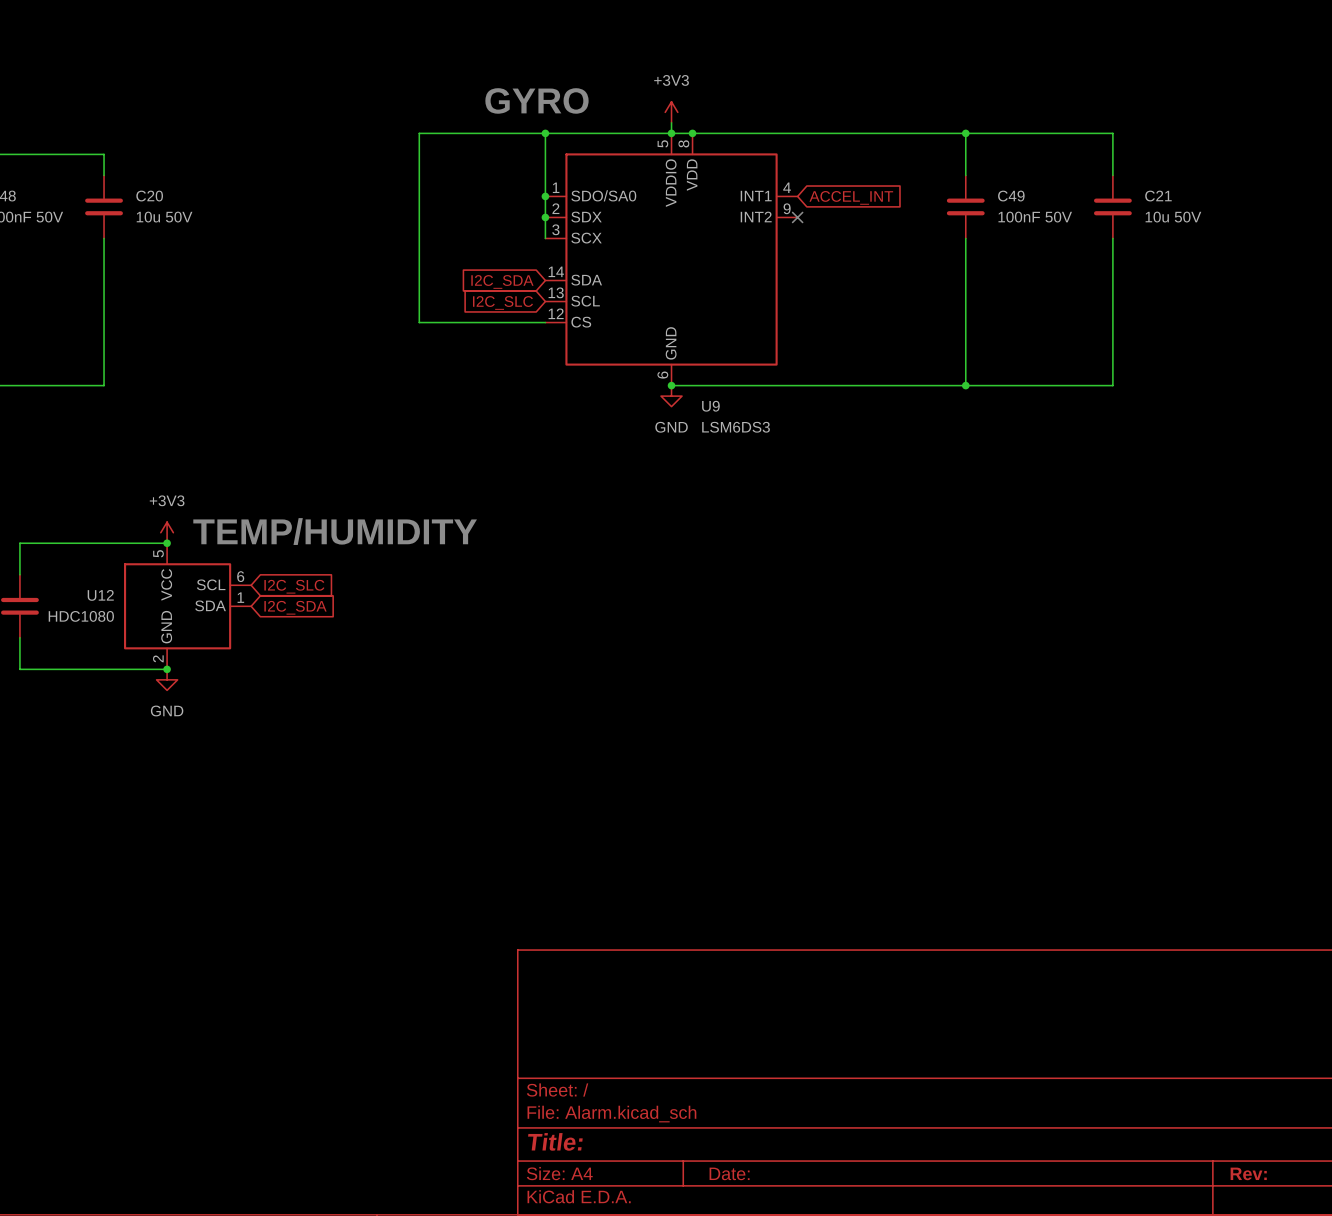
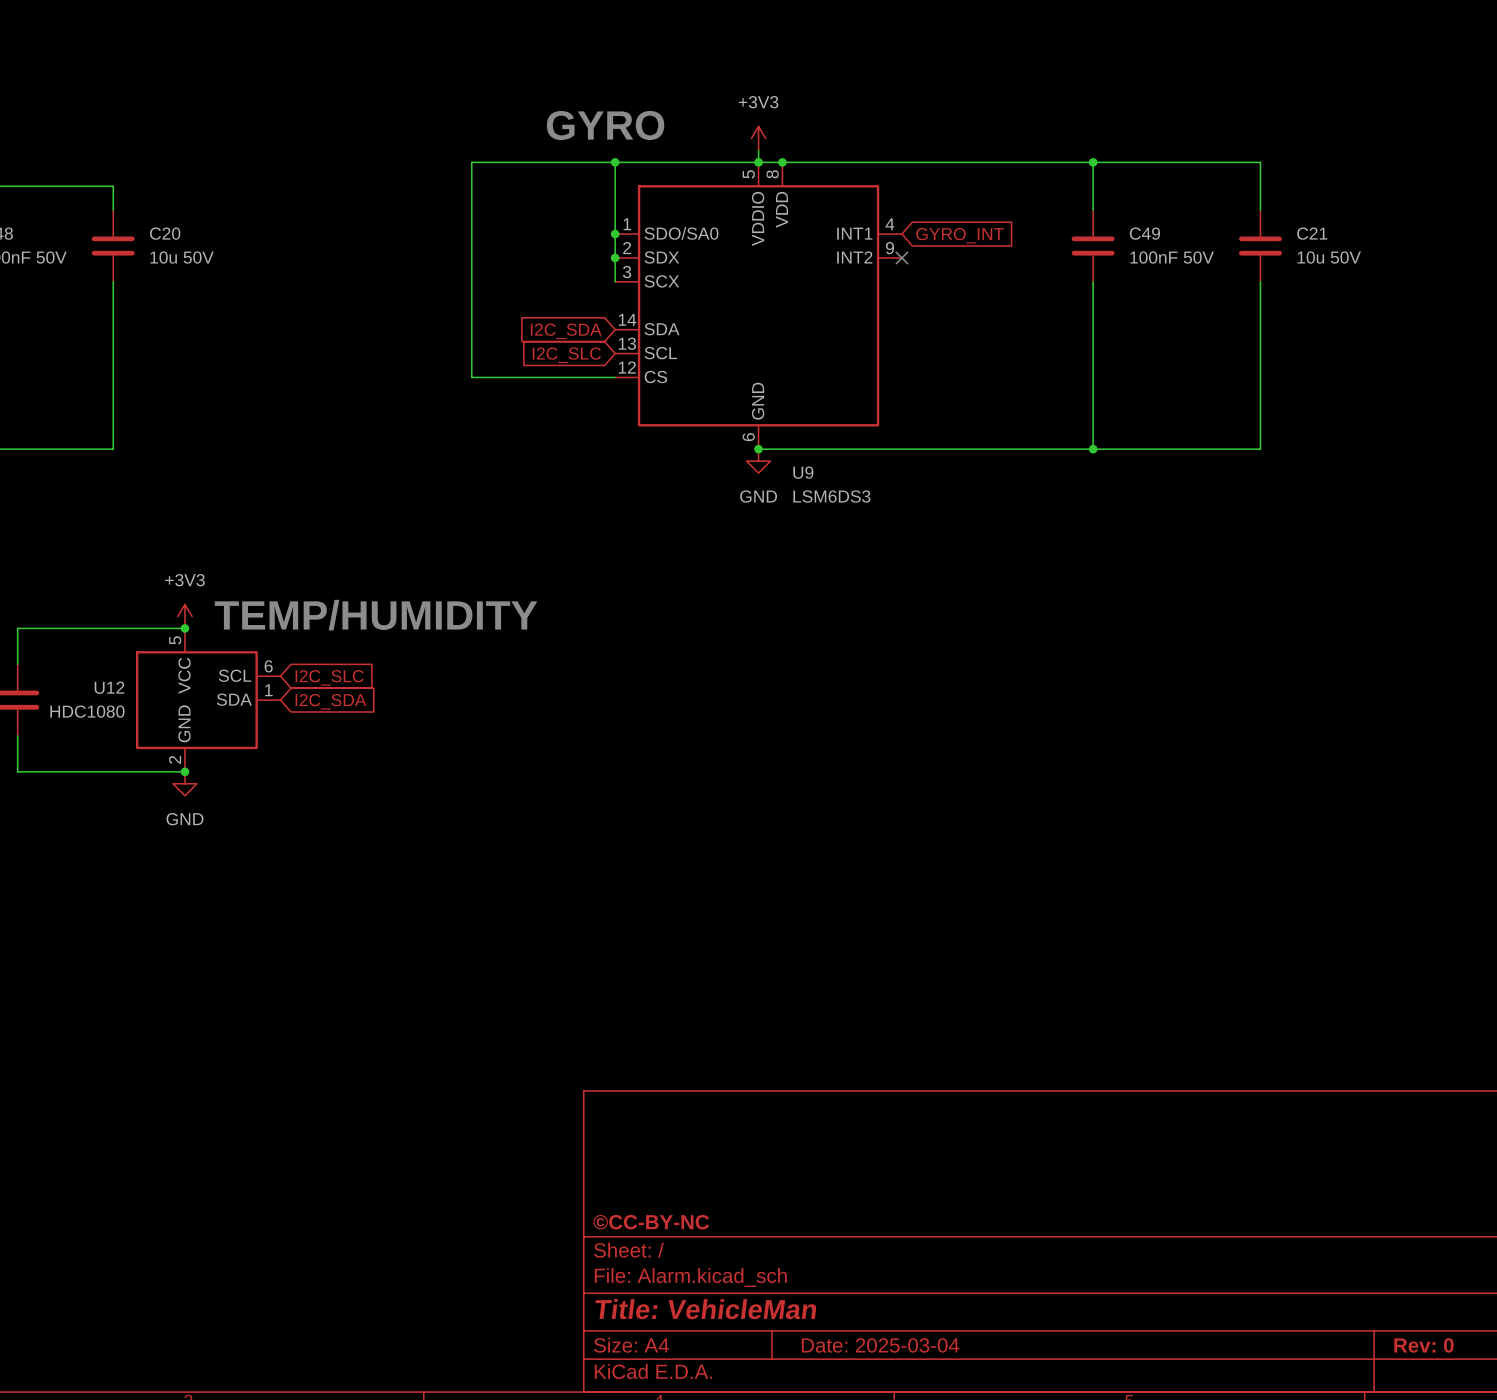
global label: ACCEL_INT (851, 197) -> GYRO_INT (960, 235)
title block: none -> ©CC-BY-NC (651, 1222)
title block: Title: (555, 1141) -> Title: VehicleMan (705, 1309)
title block: Date: (729, 1173) -> Date: 2025-03-04 (880, 1345)
title block: Rev: (1248, 1173) -> Rev: 0 (1423, 1345)

